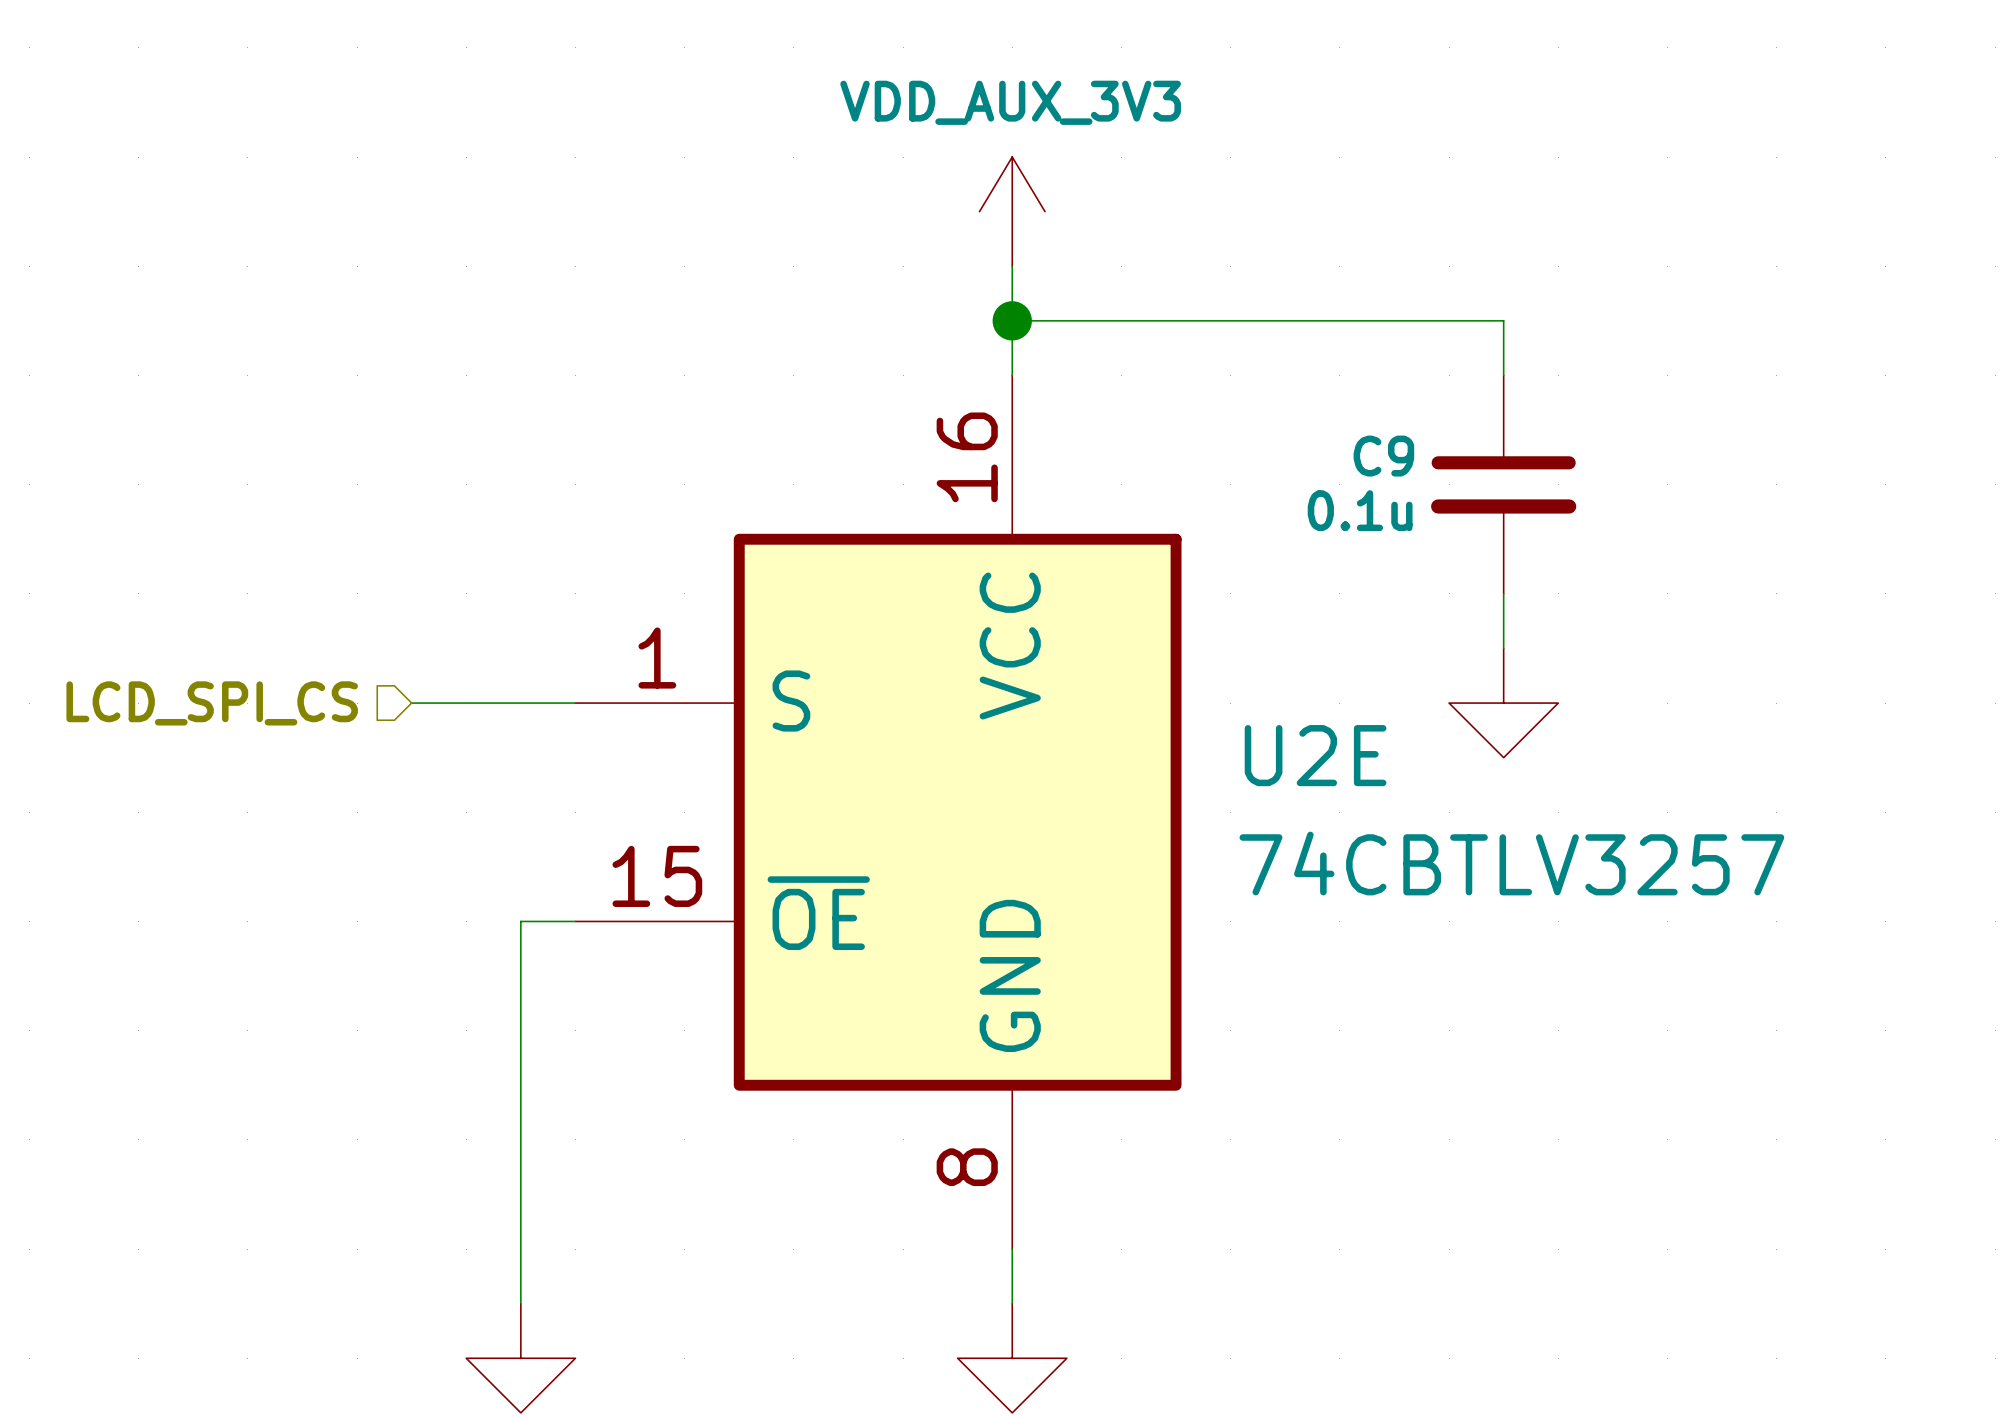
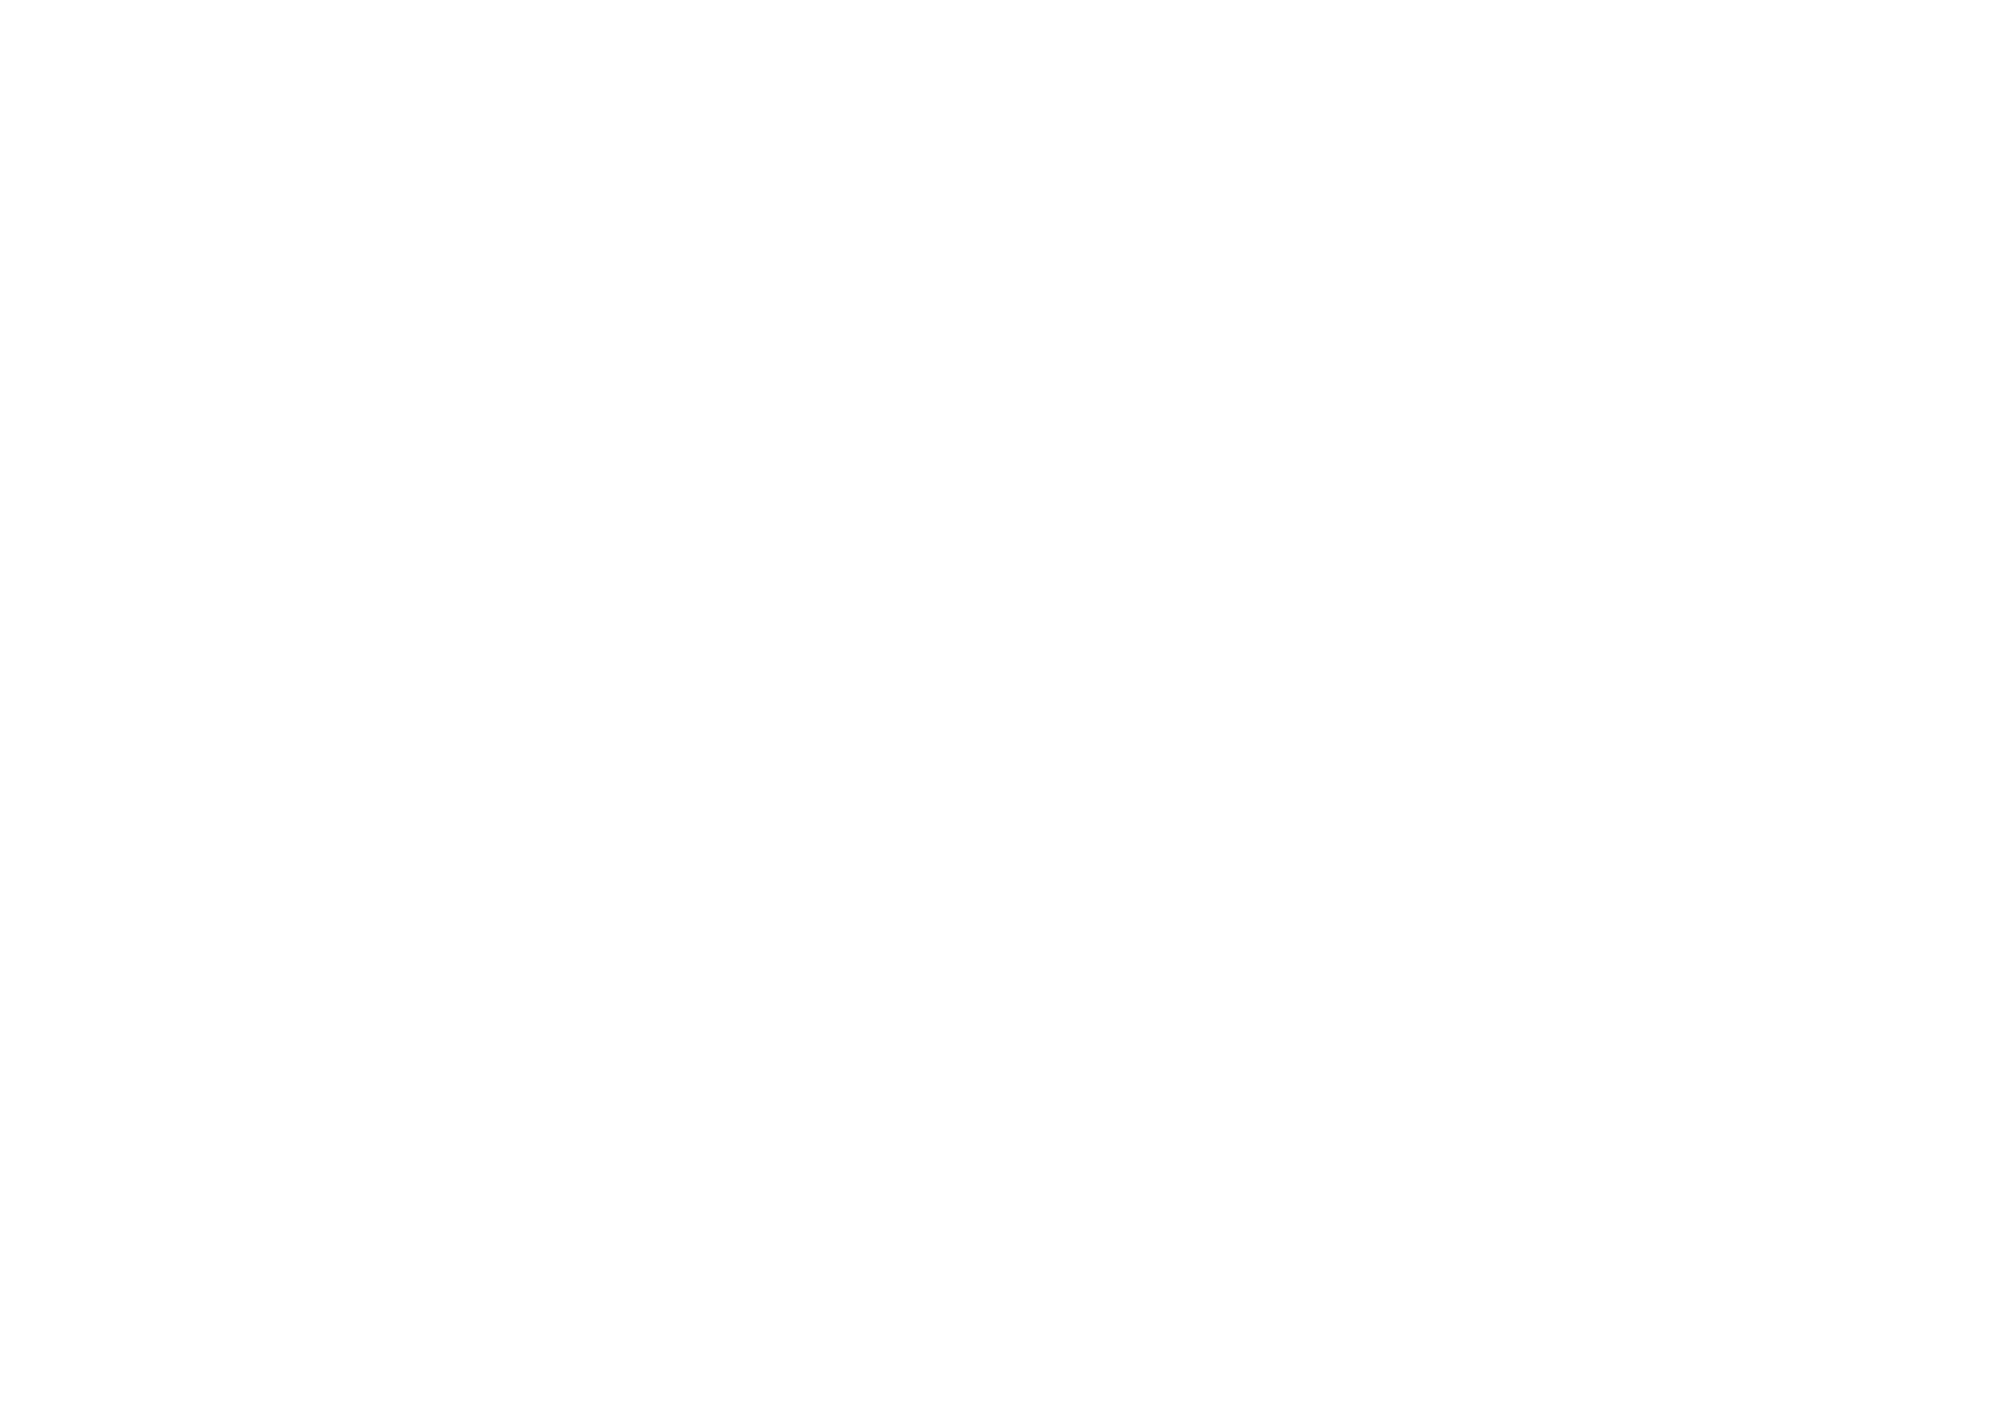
power symbol: VDD_AUX_3V3 (1012, 211) -> none
wire: (1012, 266) (1012, 375) -> none
wire: (1012, 320) (1503, 320) (1503, 375) -> none
junction: (1012, 320) -> none
C9: 0.1u (1503, 484) -> none
wire: (1503, 593) (1503, 648) -> none
hierarchical label: LCD_SPI_CS (212, 703) -> none
wire: (411, 703) (575, 703) -> none
power symbol: (1503, 703) -> none
U2E: 74CBTLV3257 (878, 812) -> none
wire: (575, 921) (520, 921) (520, 1303) -> none
wire: (1012, 1249) (1012, 1303) -> none
power symbol: (520, 1358) -> none
power symbol: (1012, 1358) -> none

